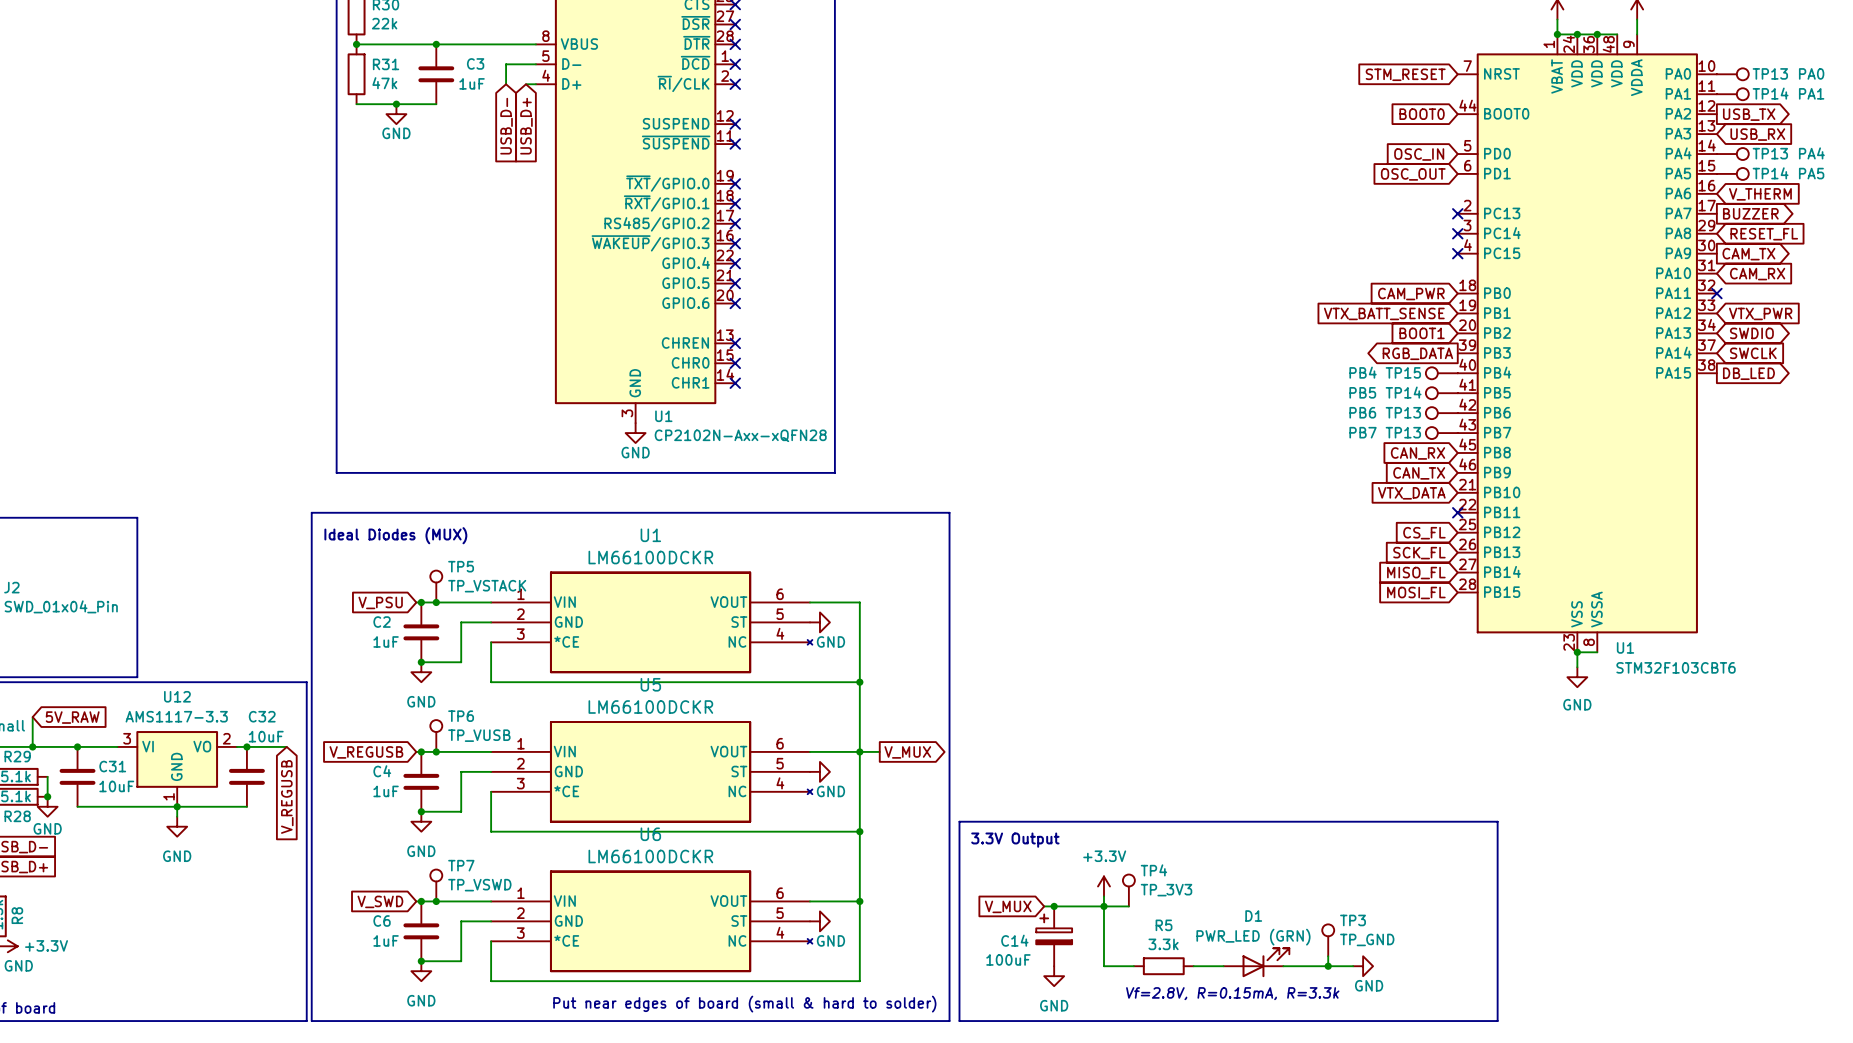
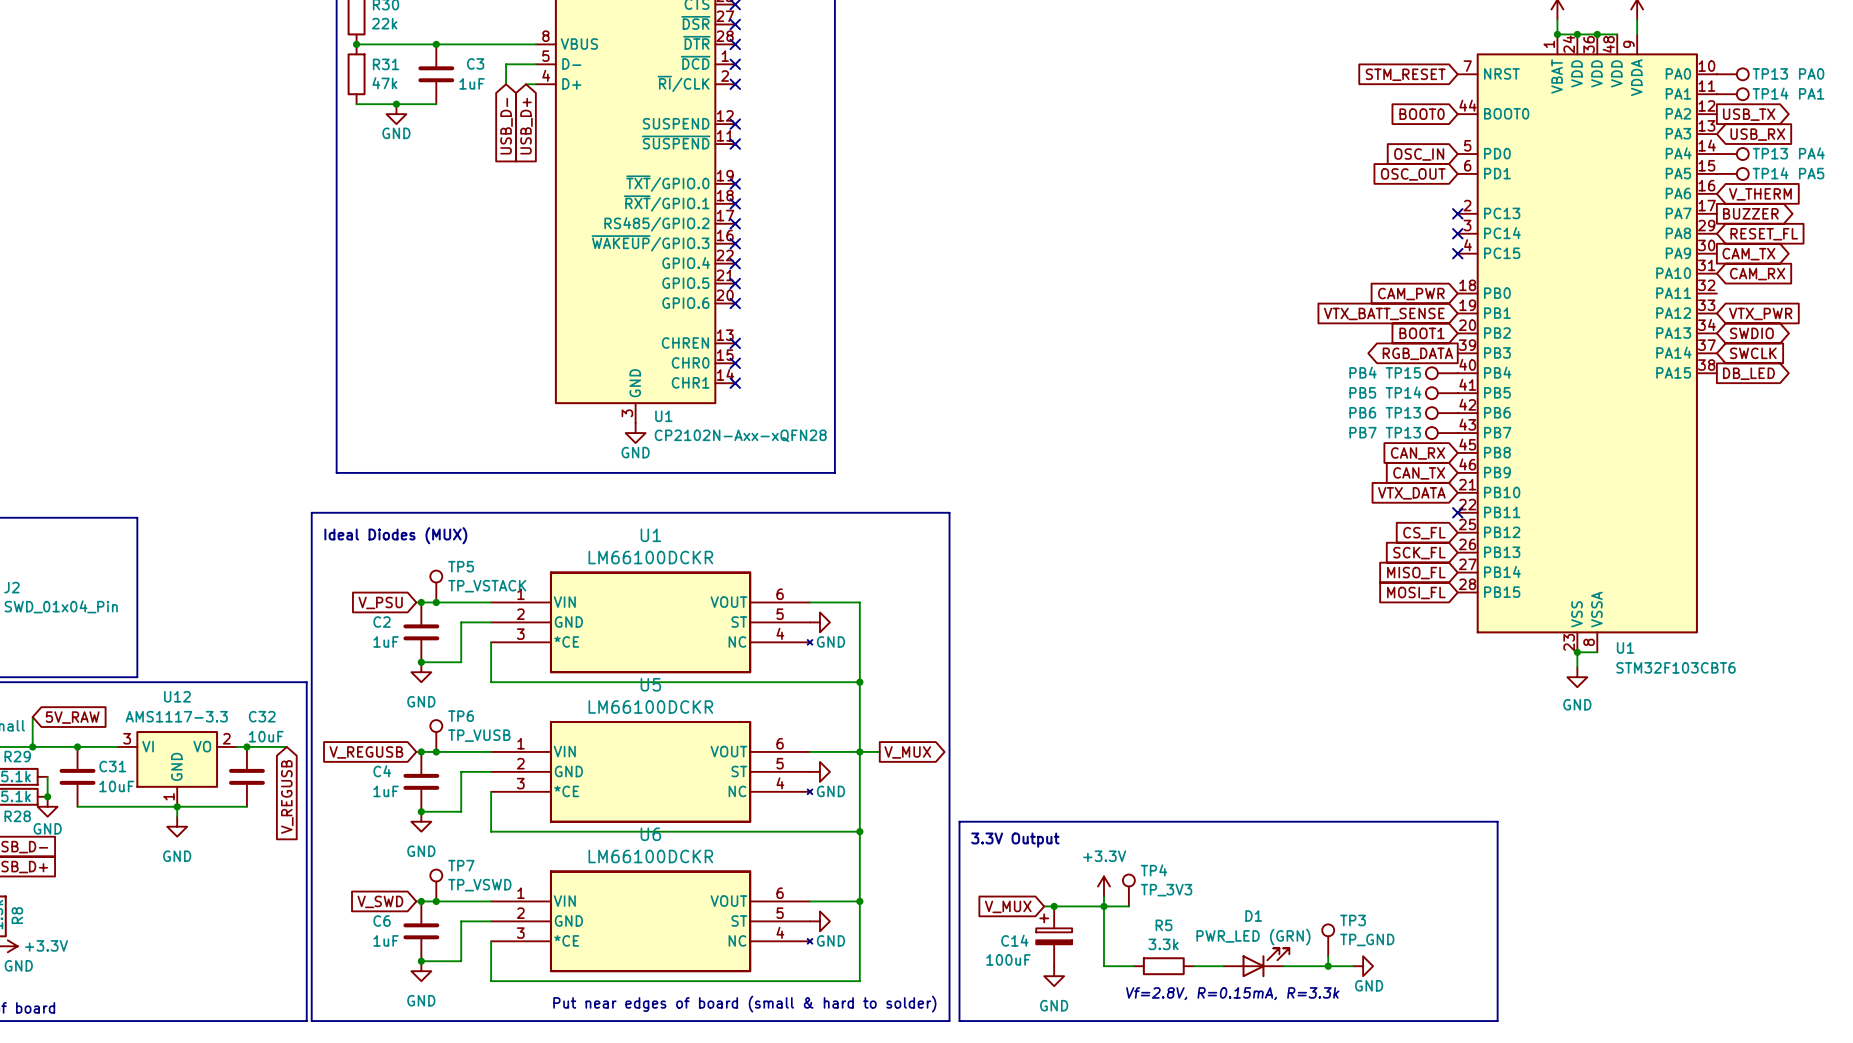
no-connect mark: (1716, 293) -> none

